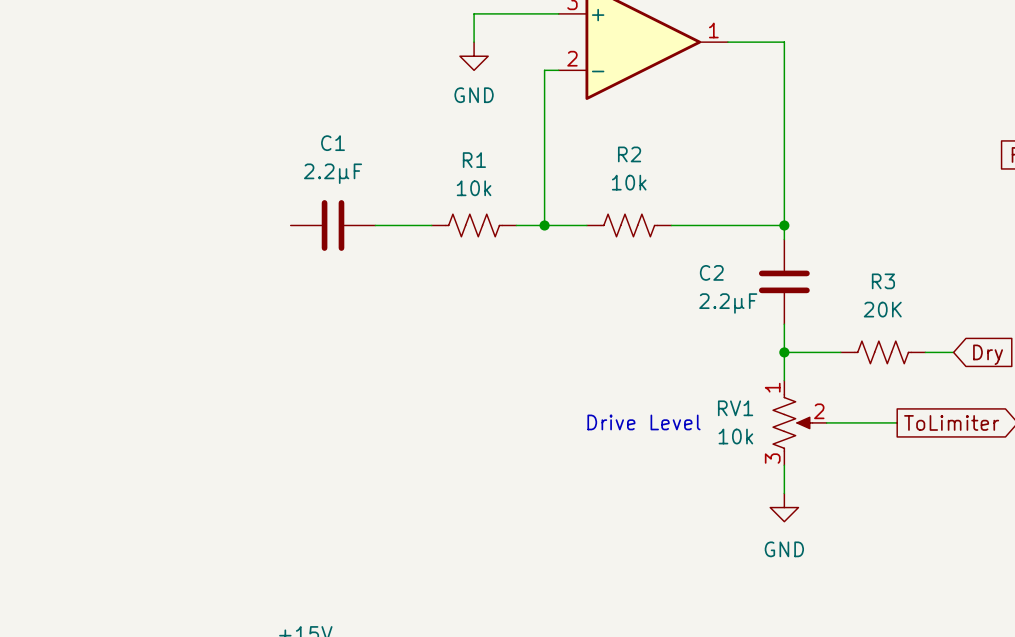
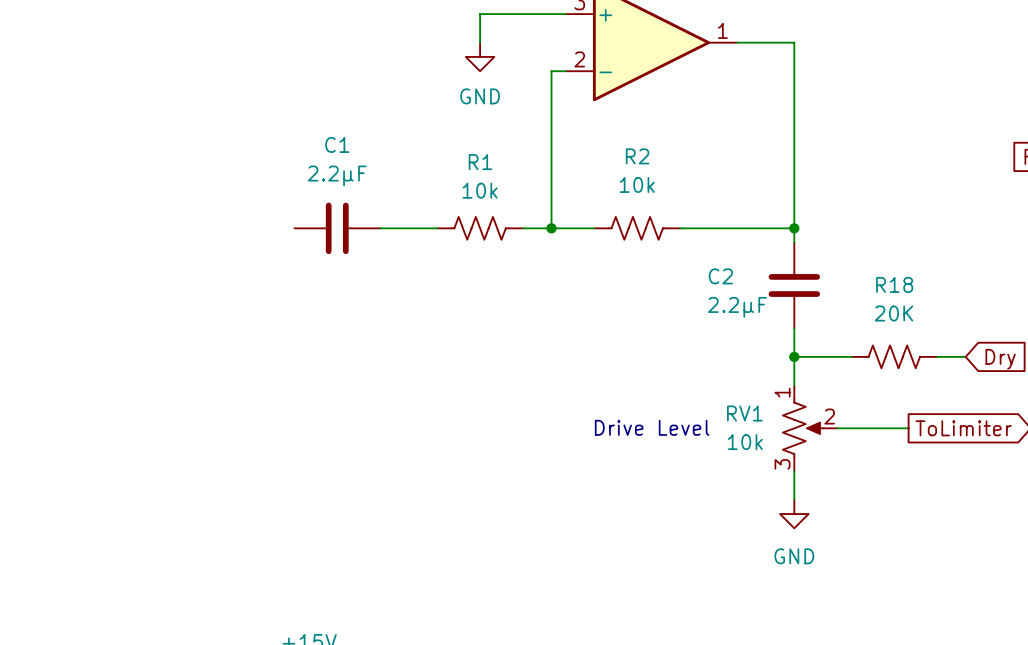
R3 name: R3 (883, 281) -> R18 (894, 284)

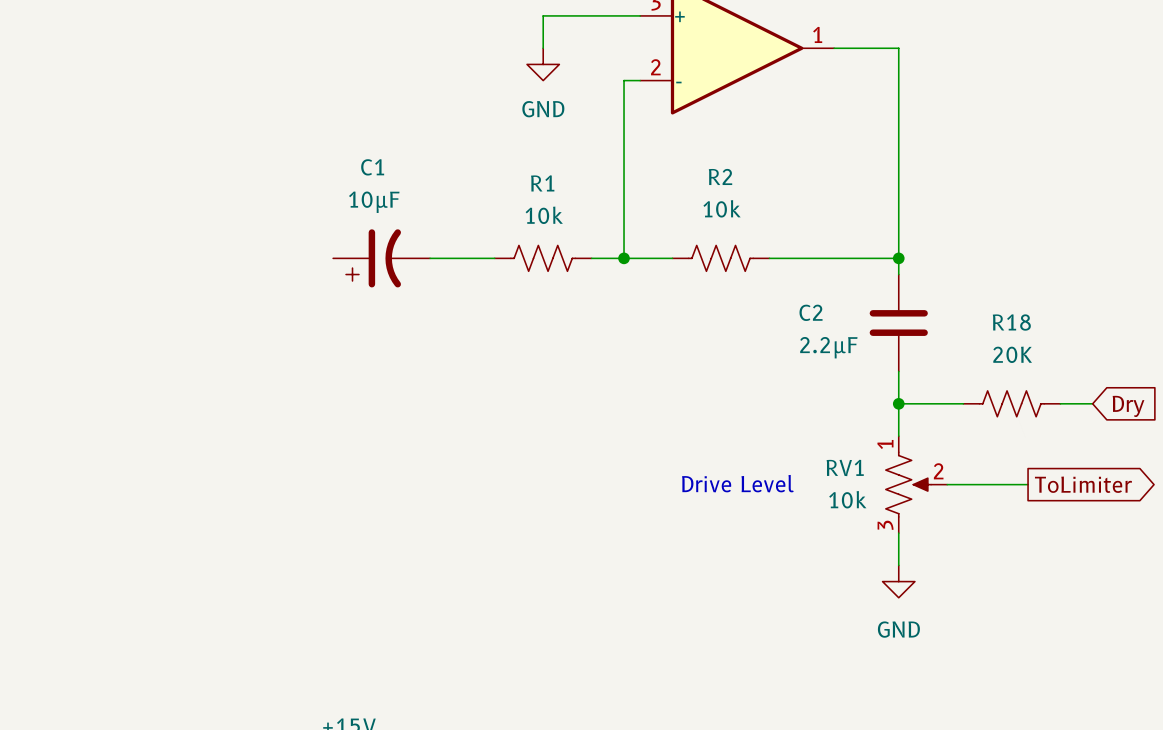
C1 value: 2.2µF (337, 175) -> 10µF (374, 202)
C1 symbol: [294, 202, 381, 255] -> [333, 229, 431, 288]

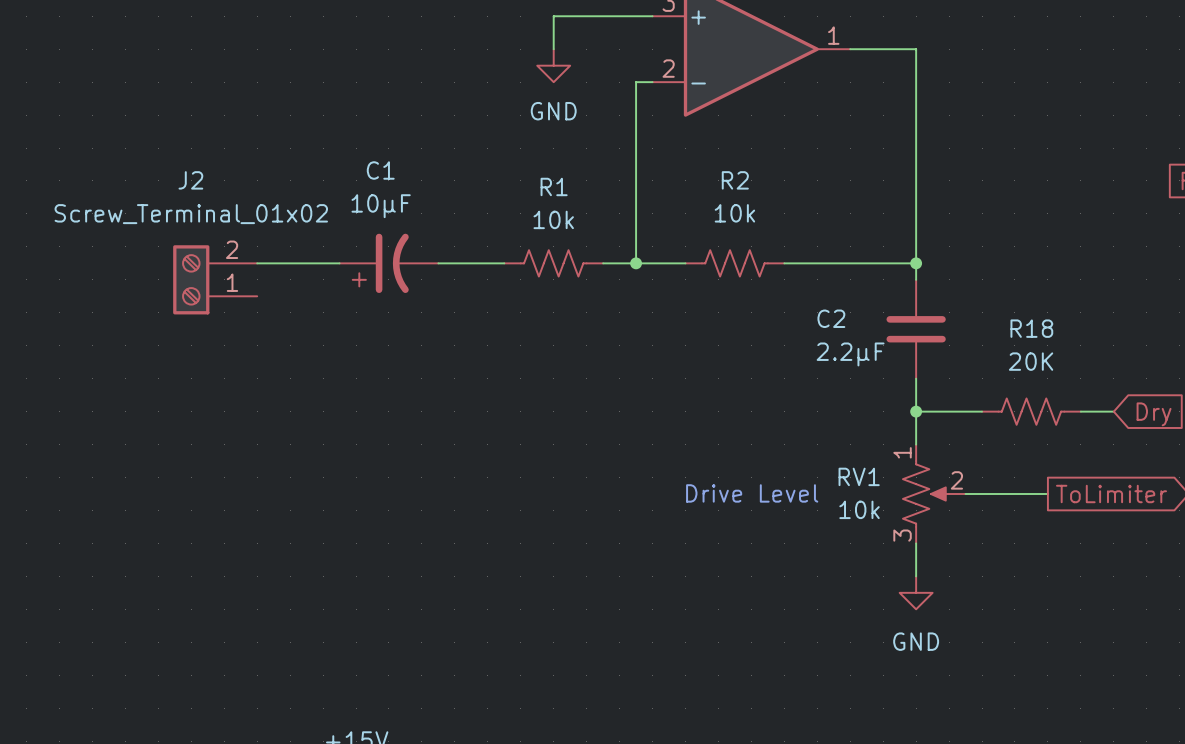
wire: none -> (257, 263) (339, 263)
J2: none -> Screw_Terminal_01x02 (215, 279)

